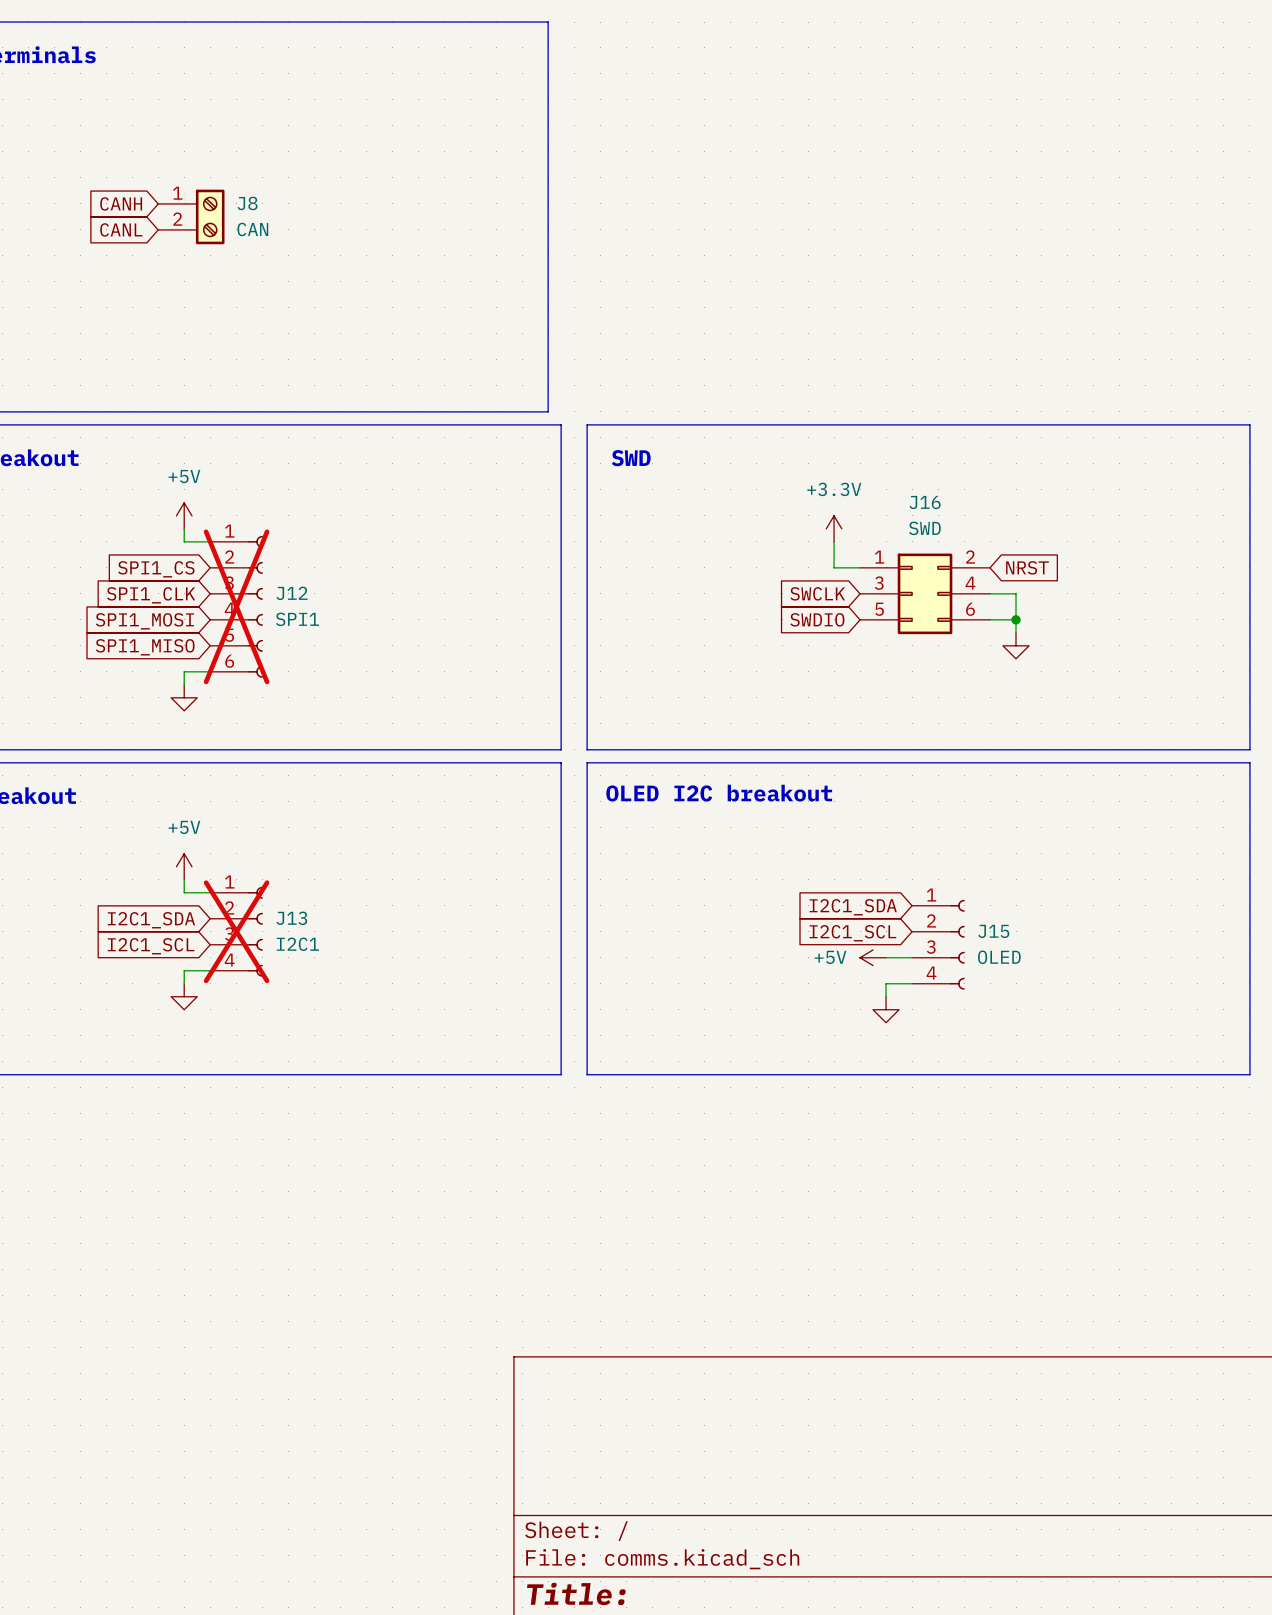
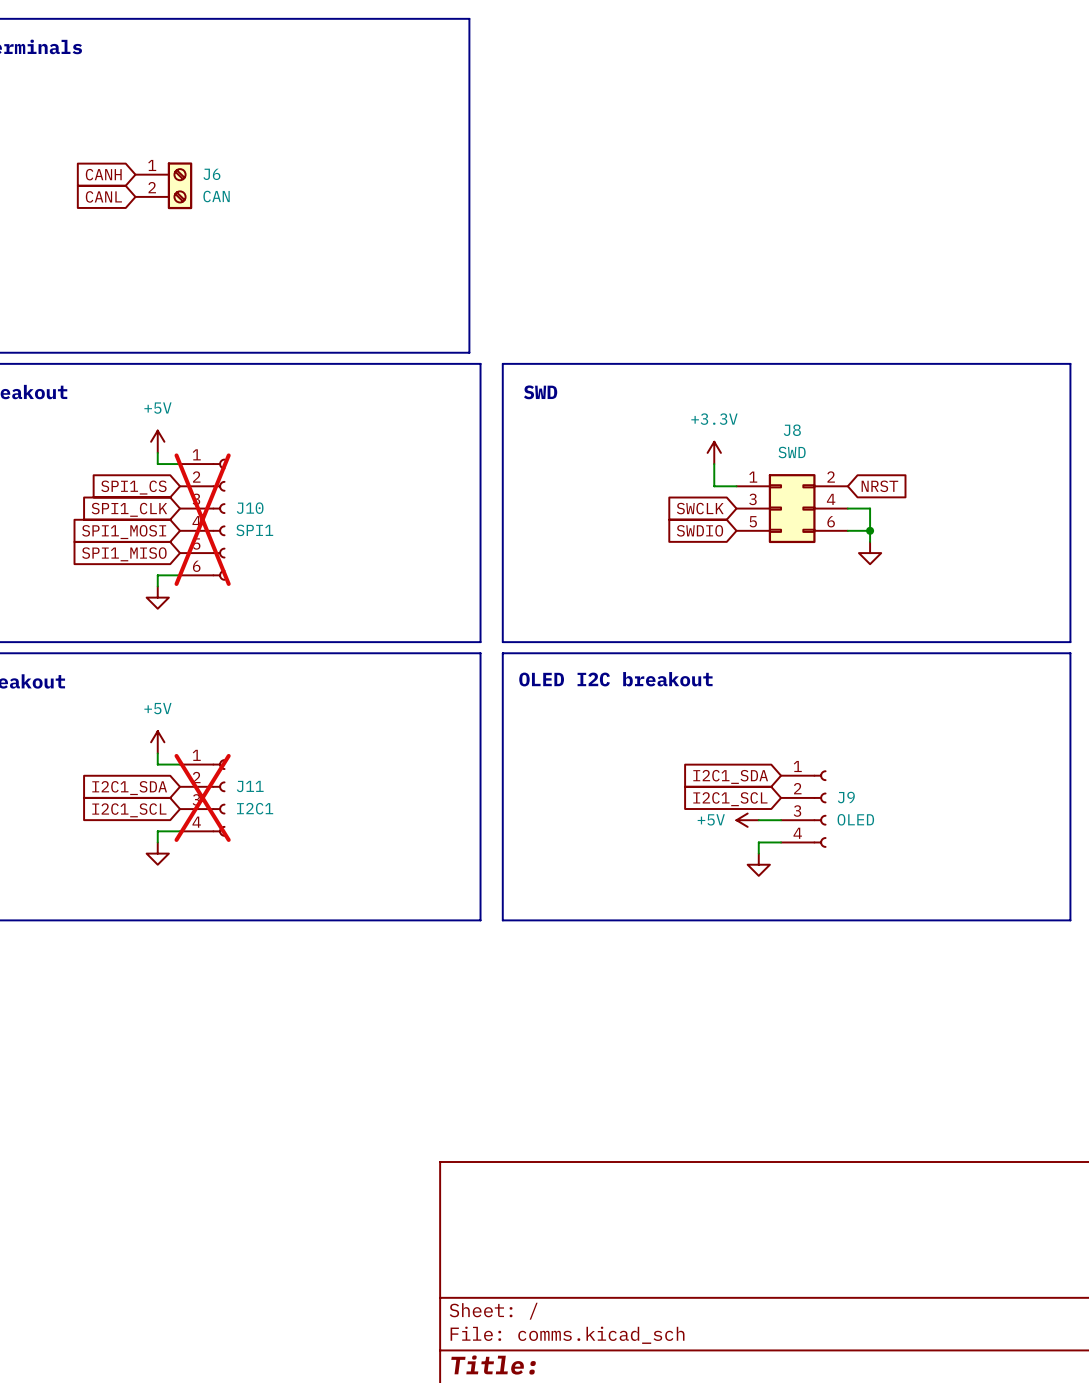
J8 name: J8 (247, 203) -> J6 (211, 174)
J16 name: J16 (925, 502) -> J8 (792, 430)
J12 name: J12 (292, 593) -> J10 (250, 508)
J13 name: J13 (291, 918) -> J11 (250, 786)
J15 name: J15 (993, 931) -> J9 (846, 797)

